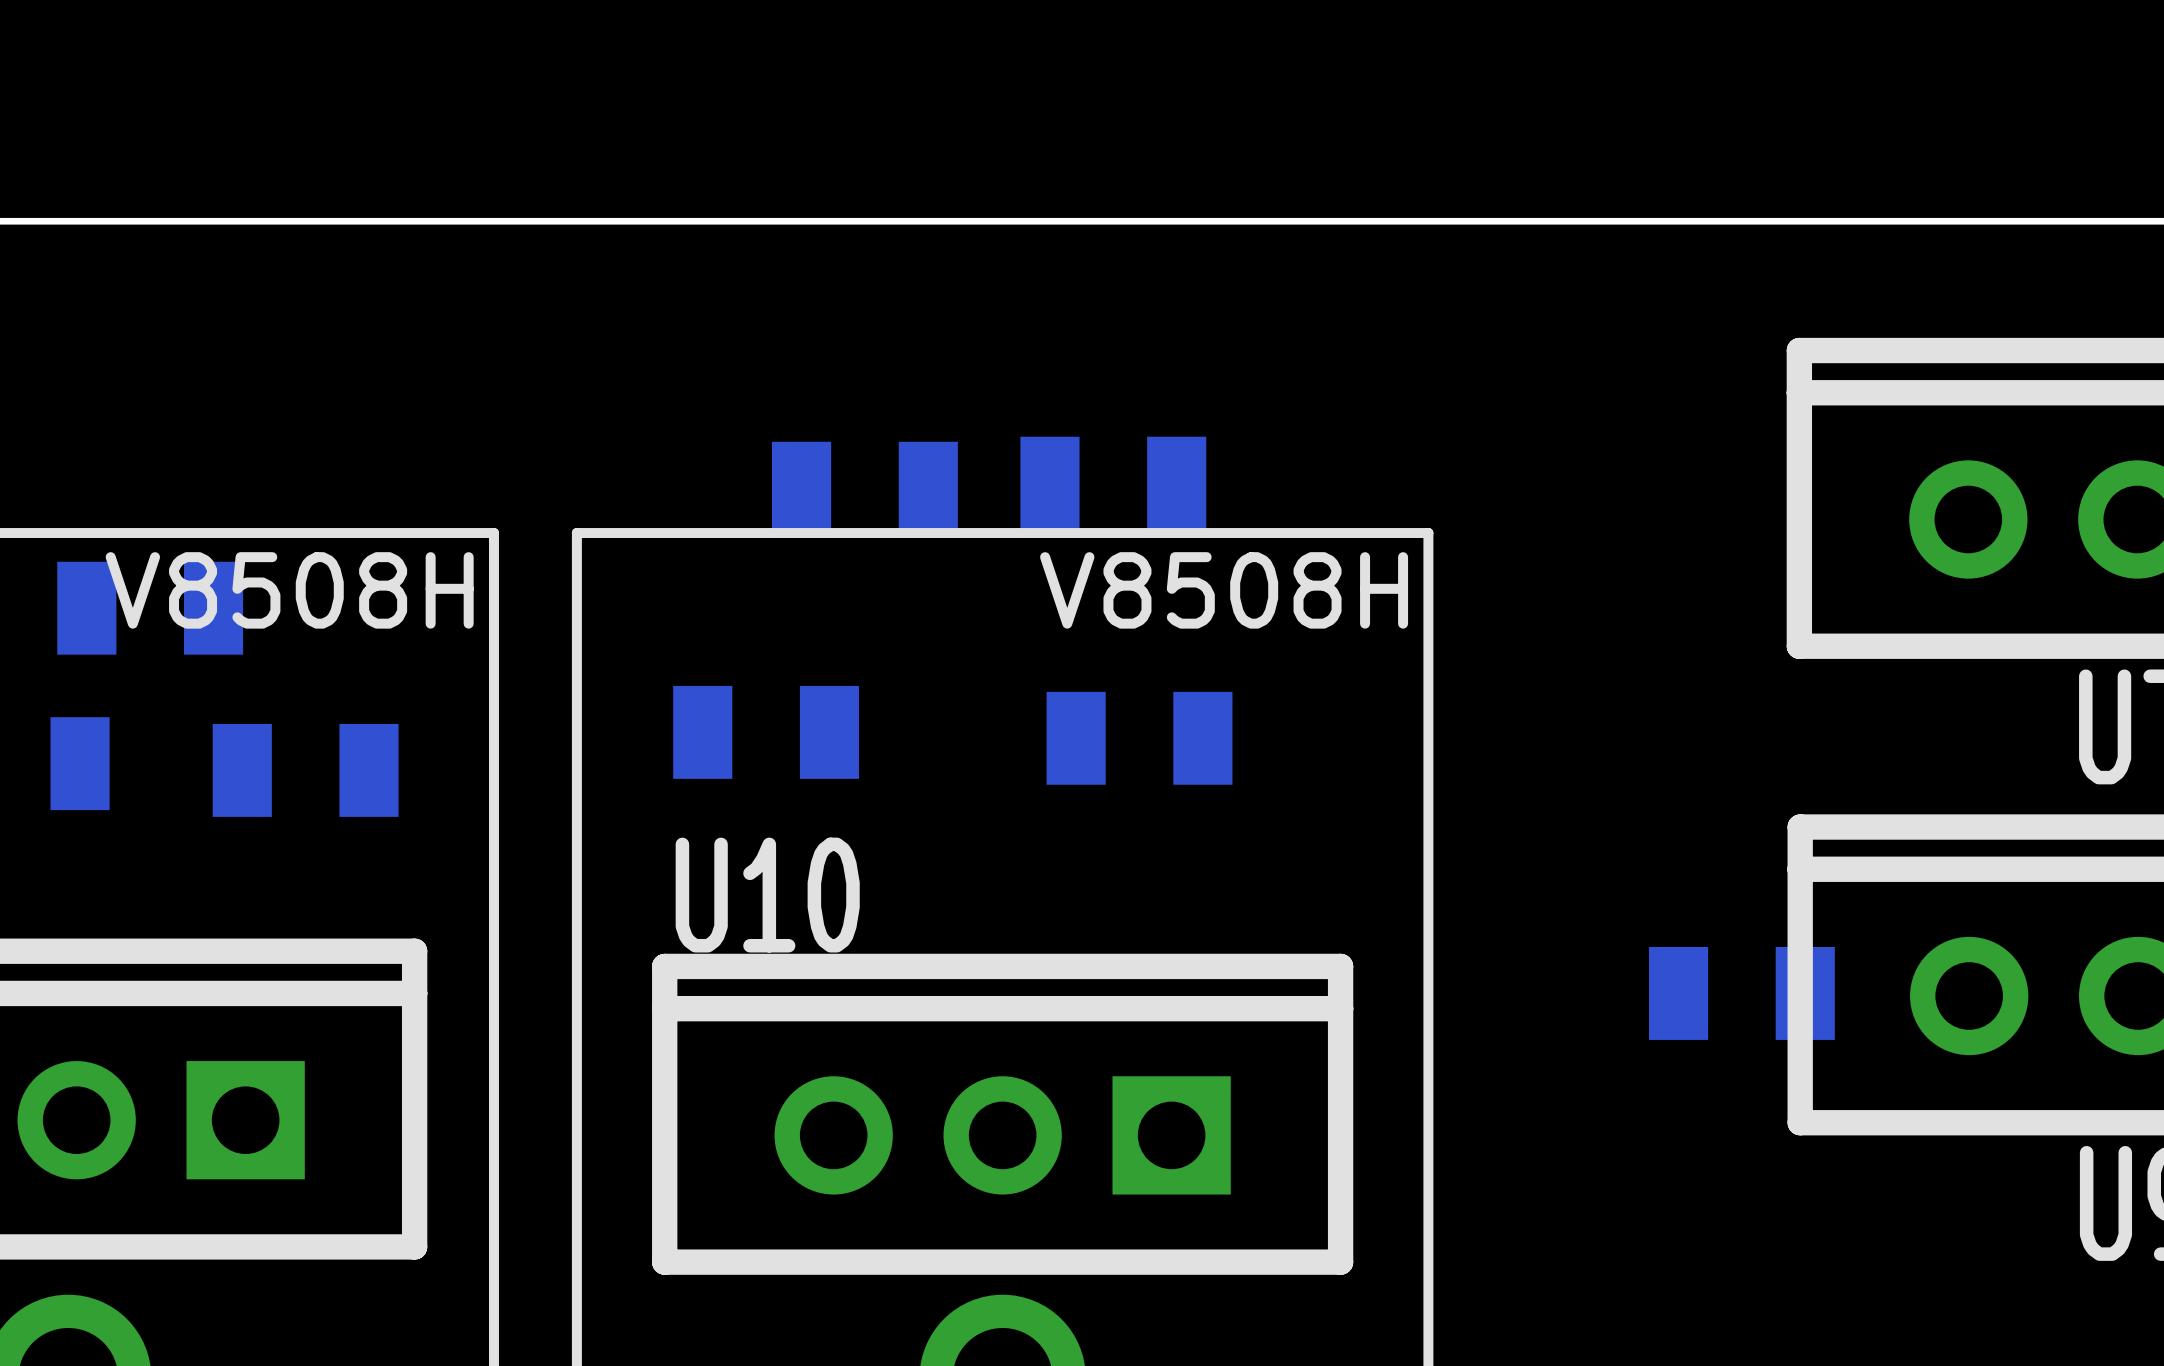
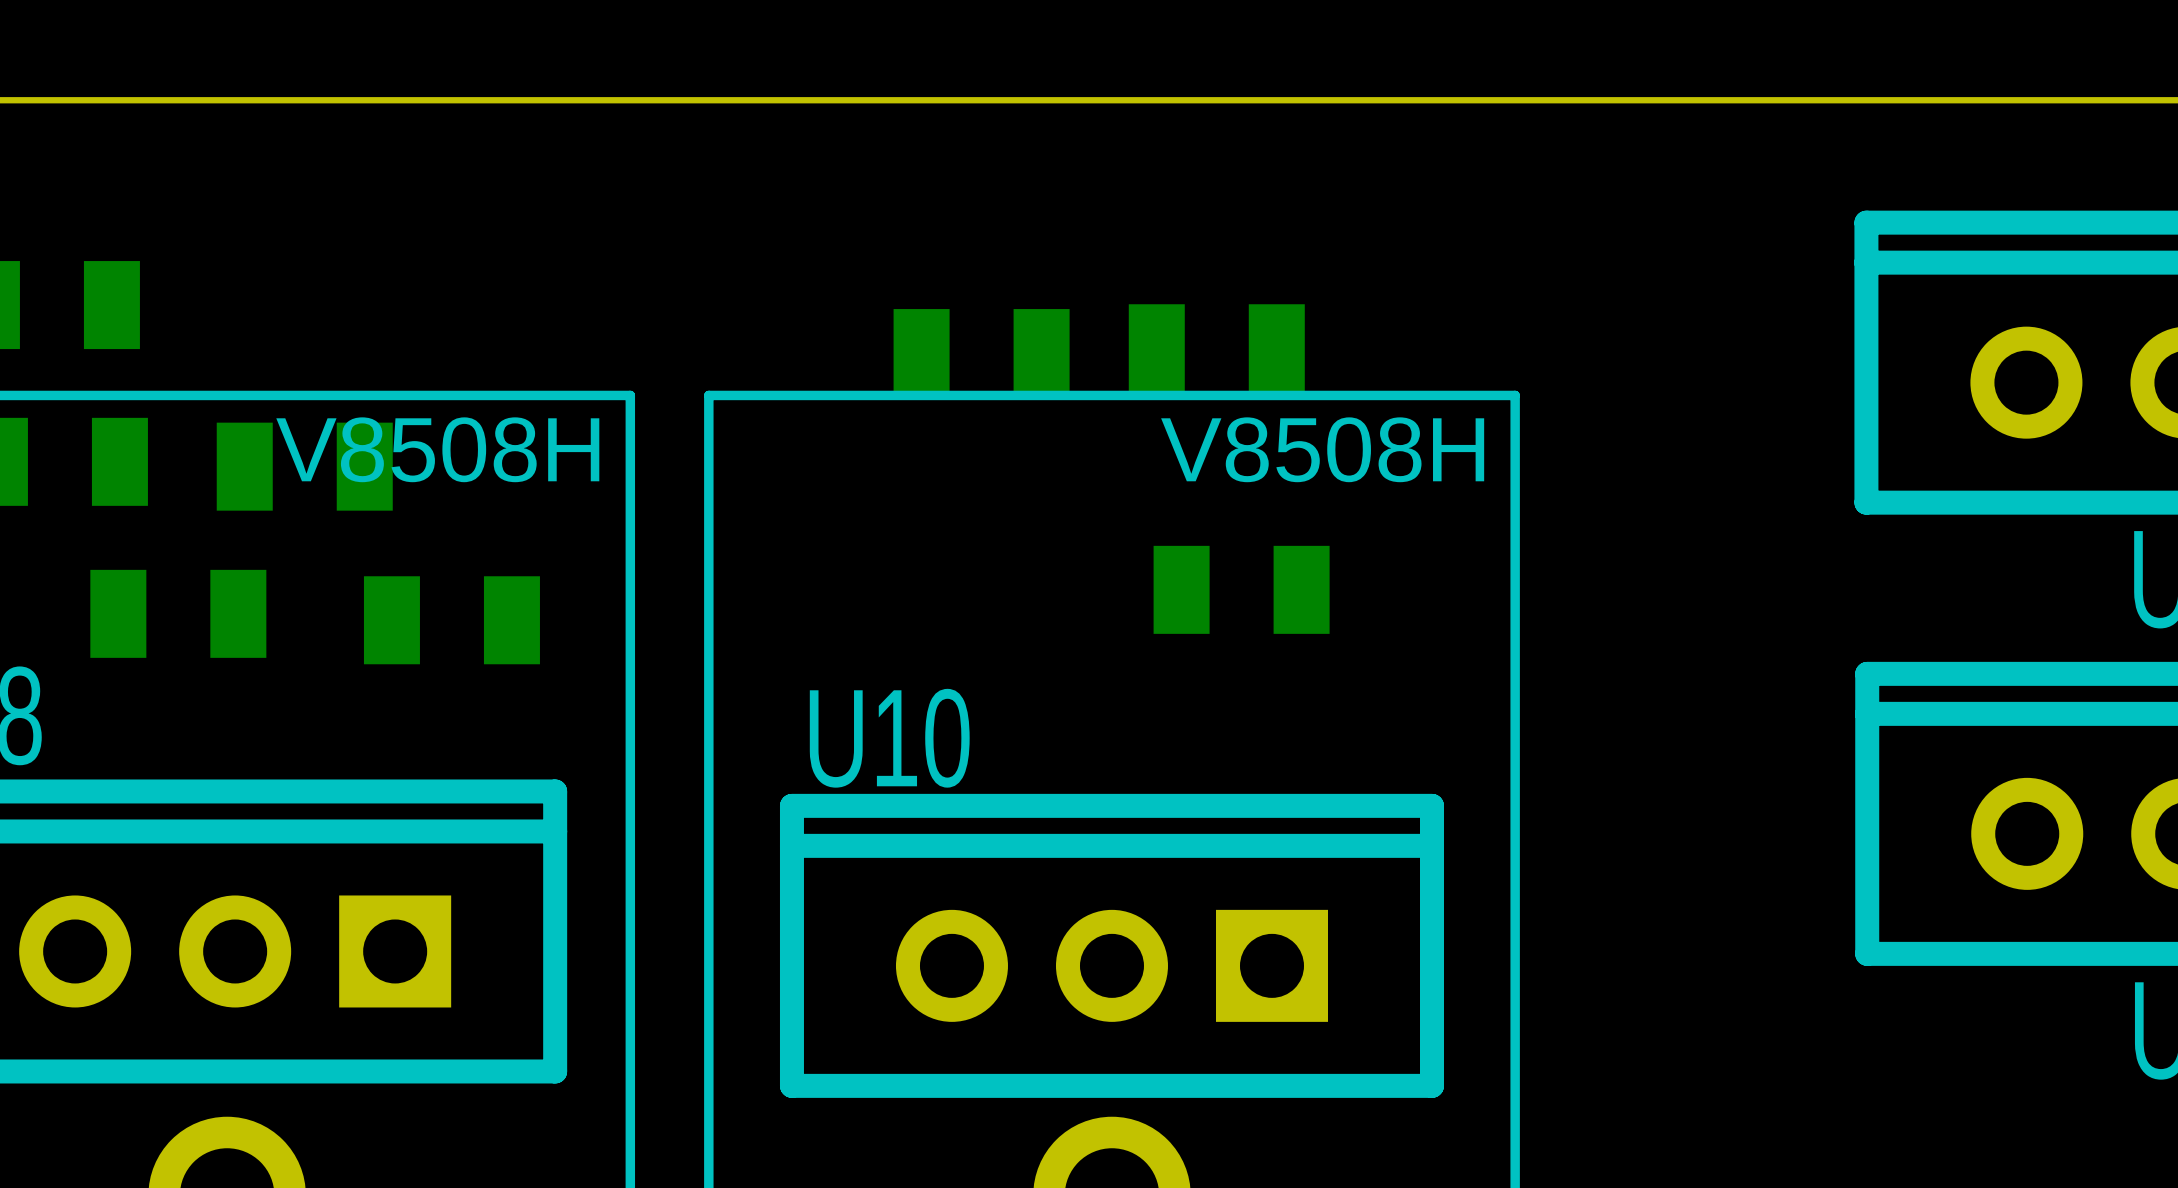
part: (766, 732) -> none
part: (1741, 993) -> none

